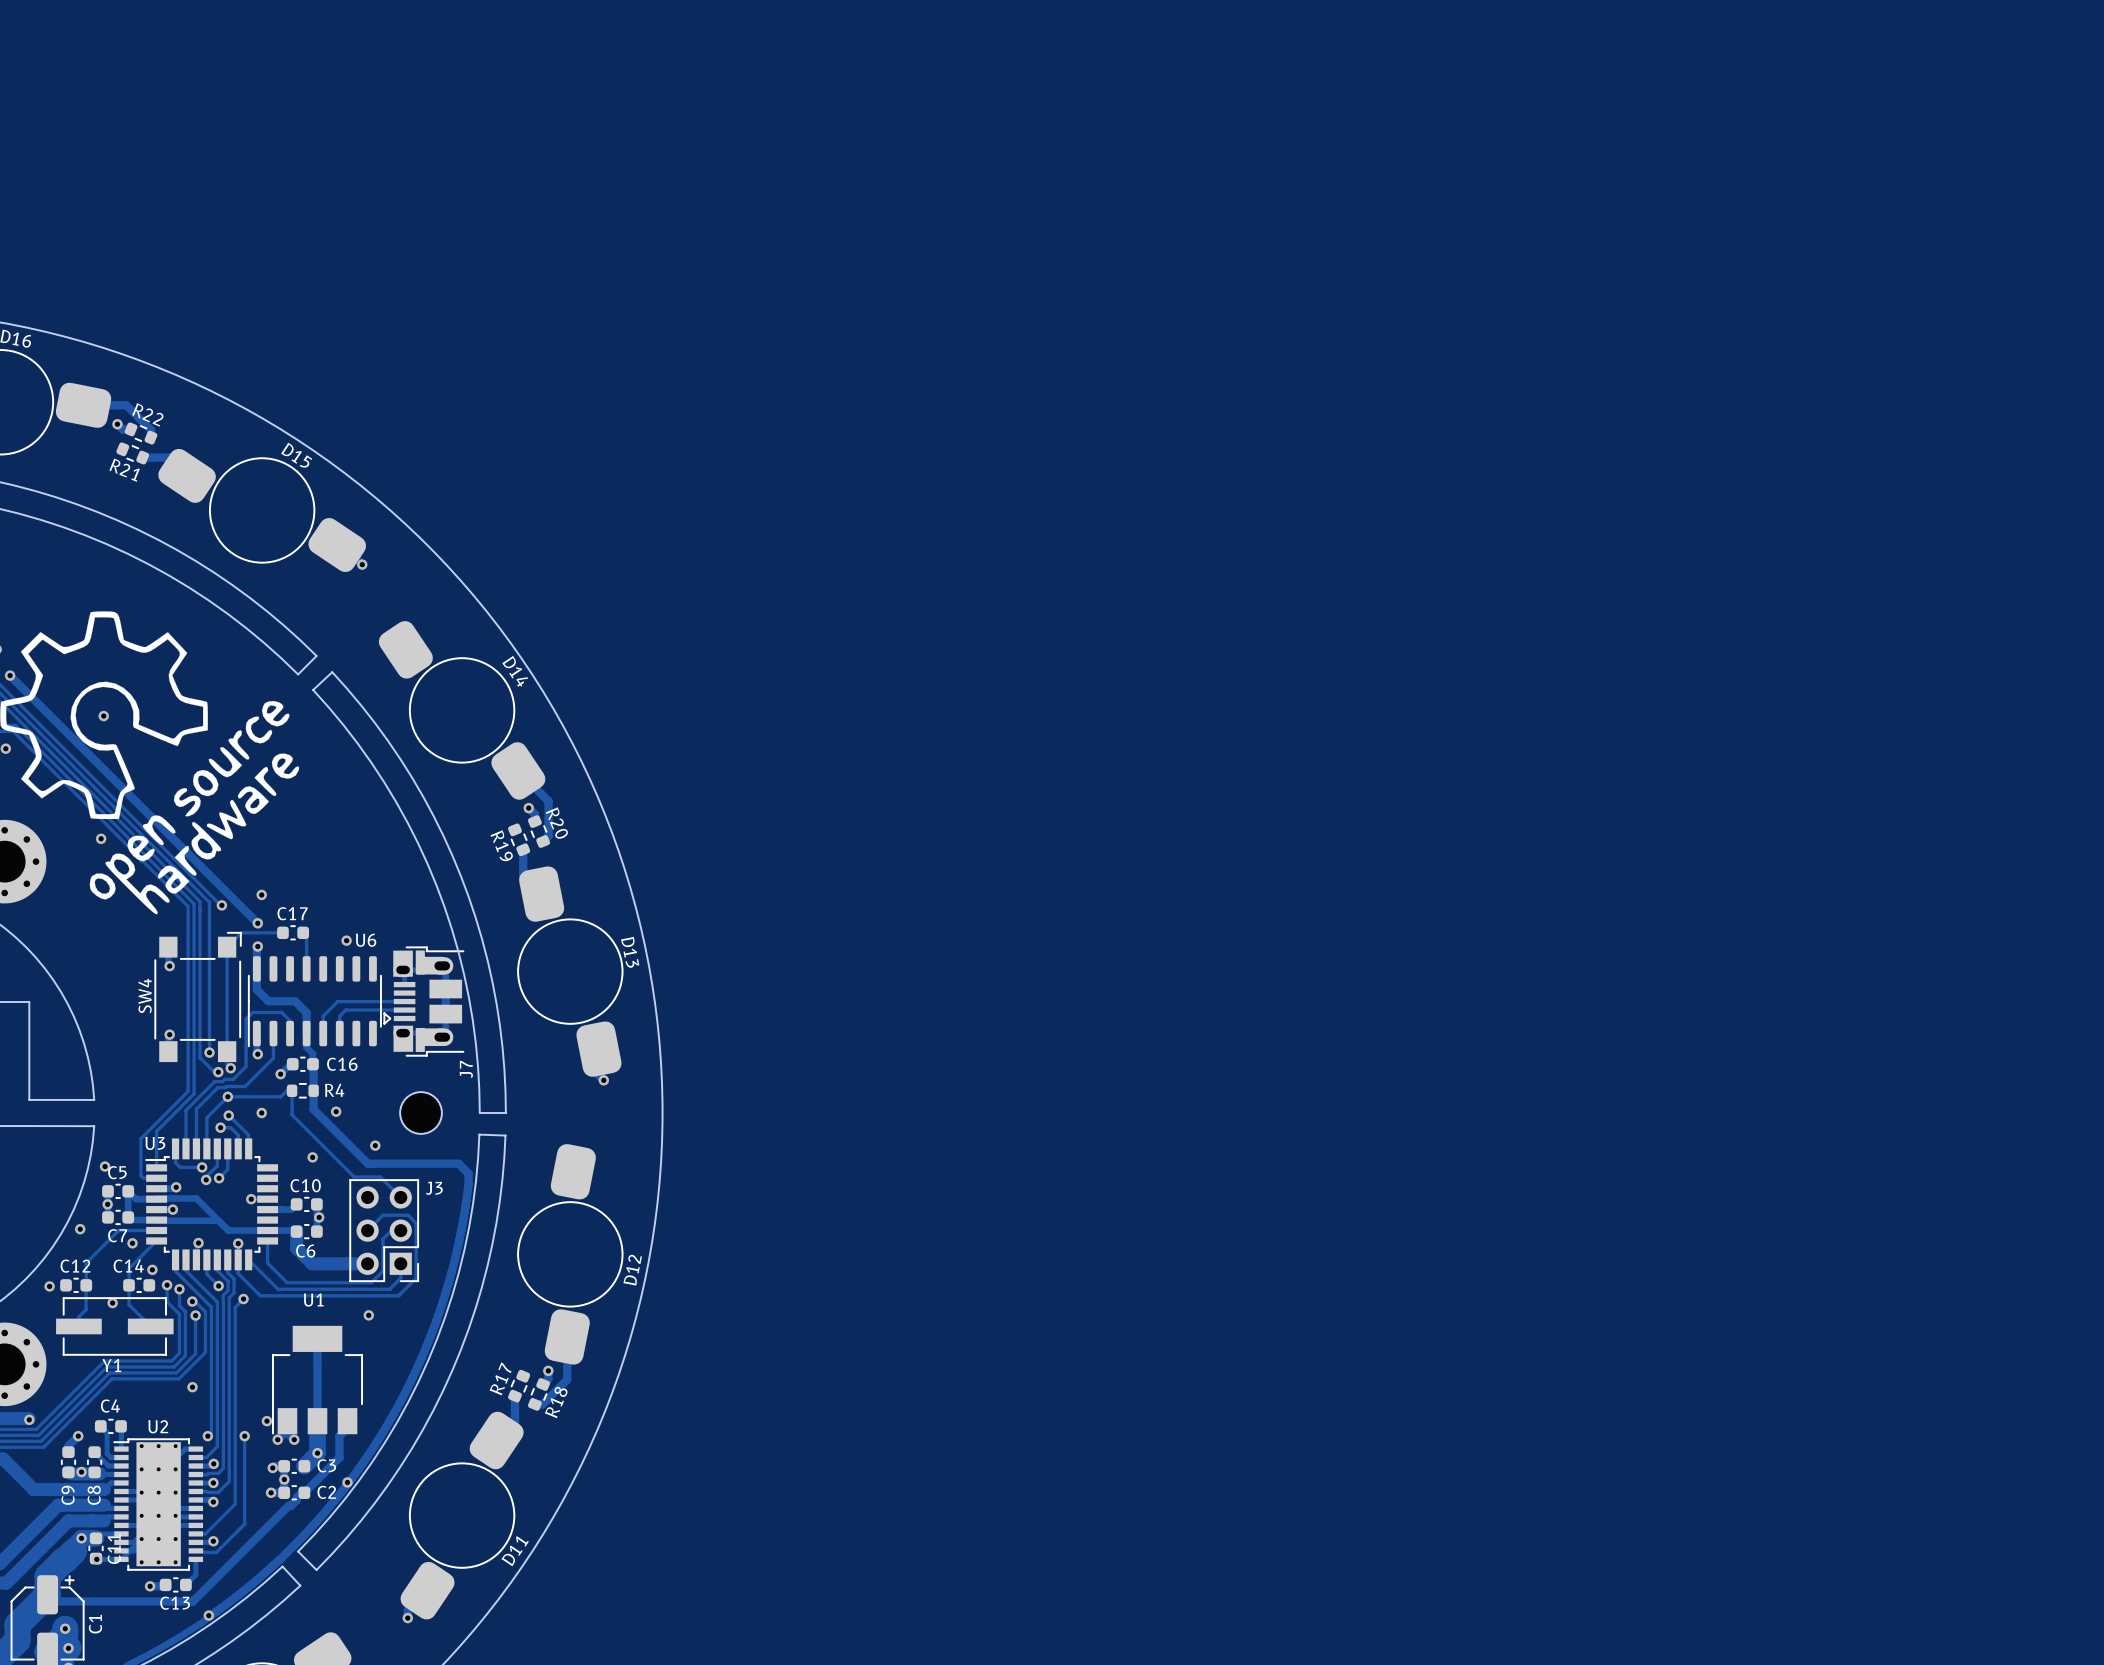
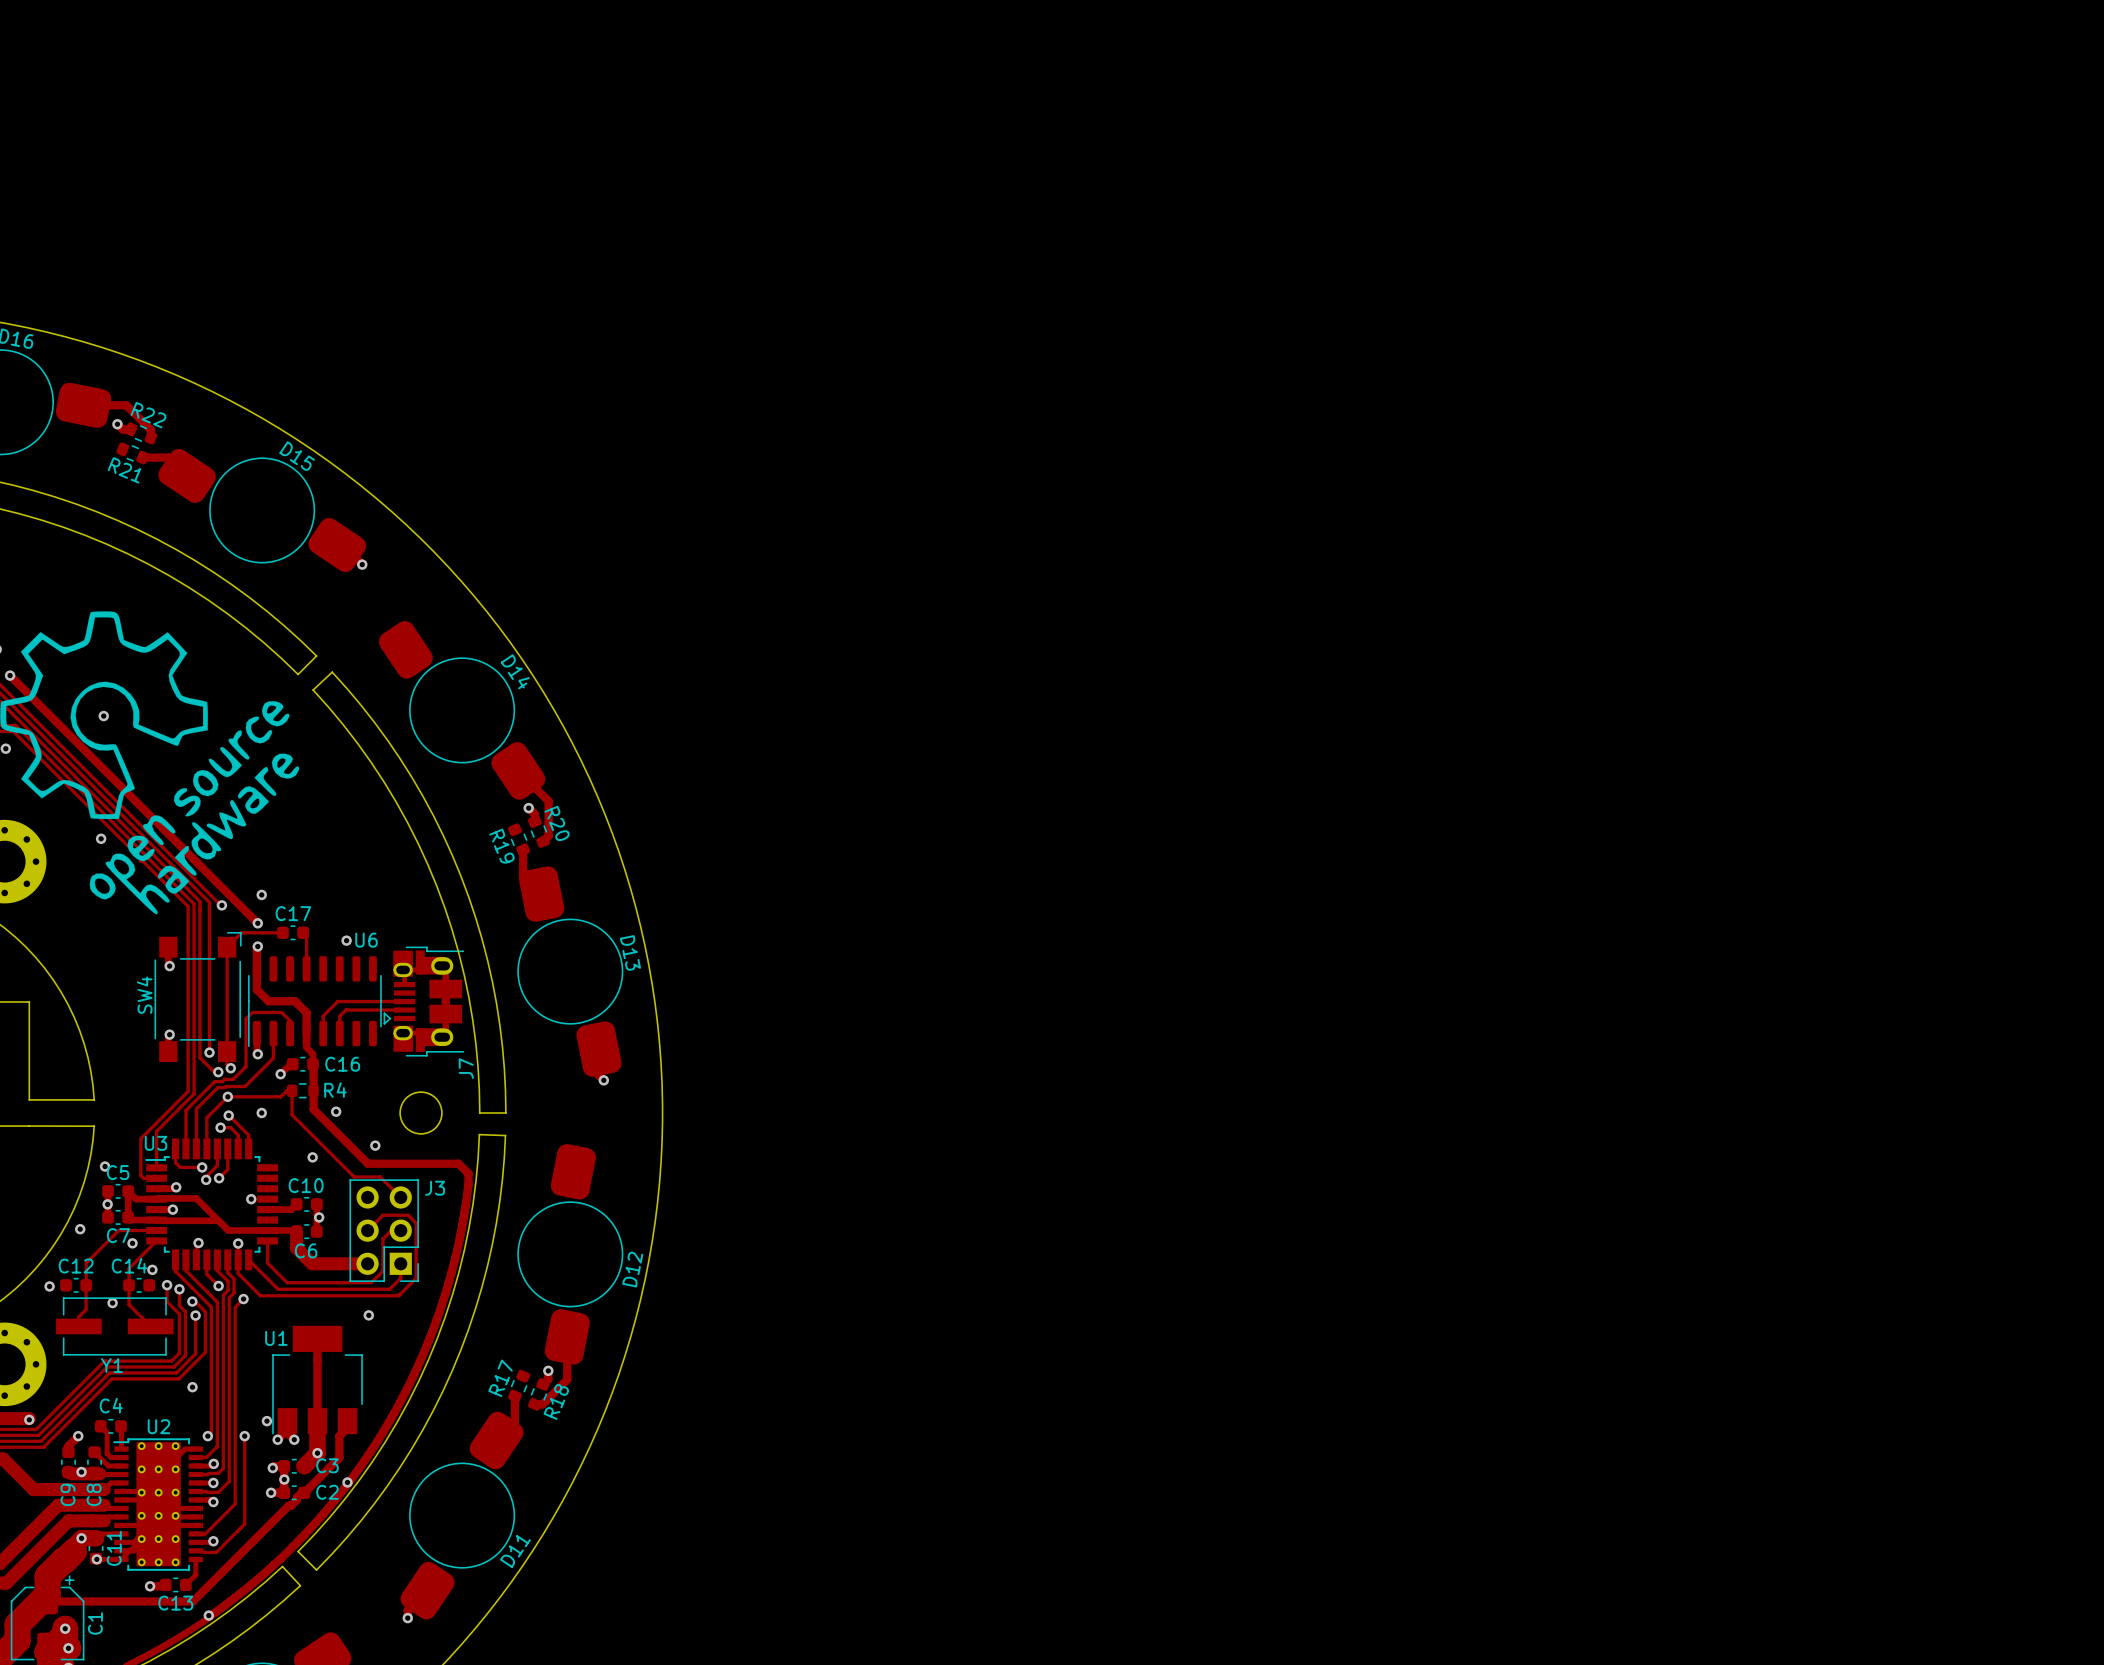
U1 name position: U1 (313, 1300) -> U1 (276, 1338)

